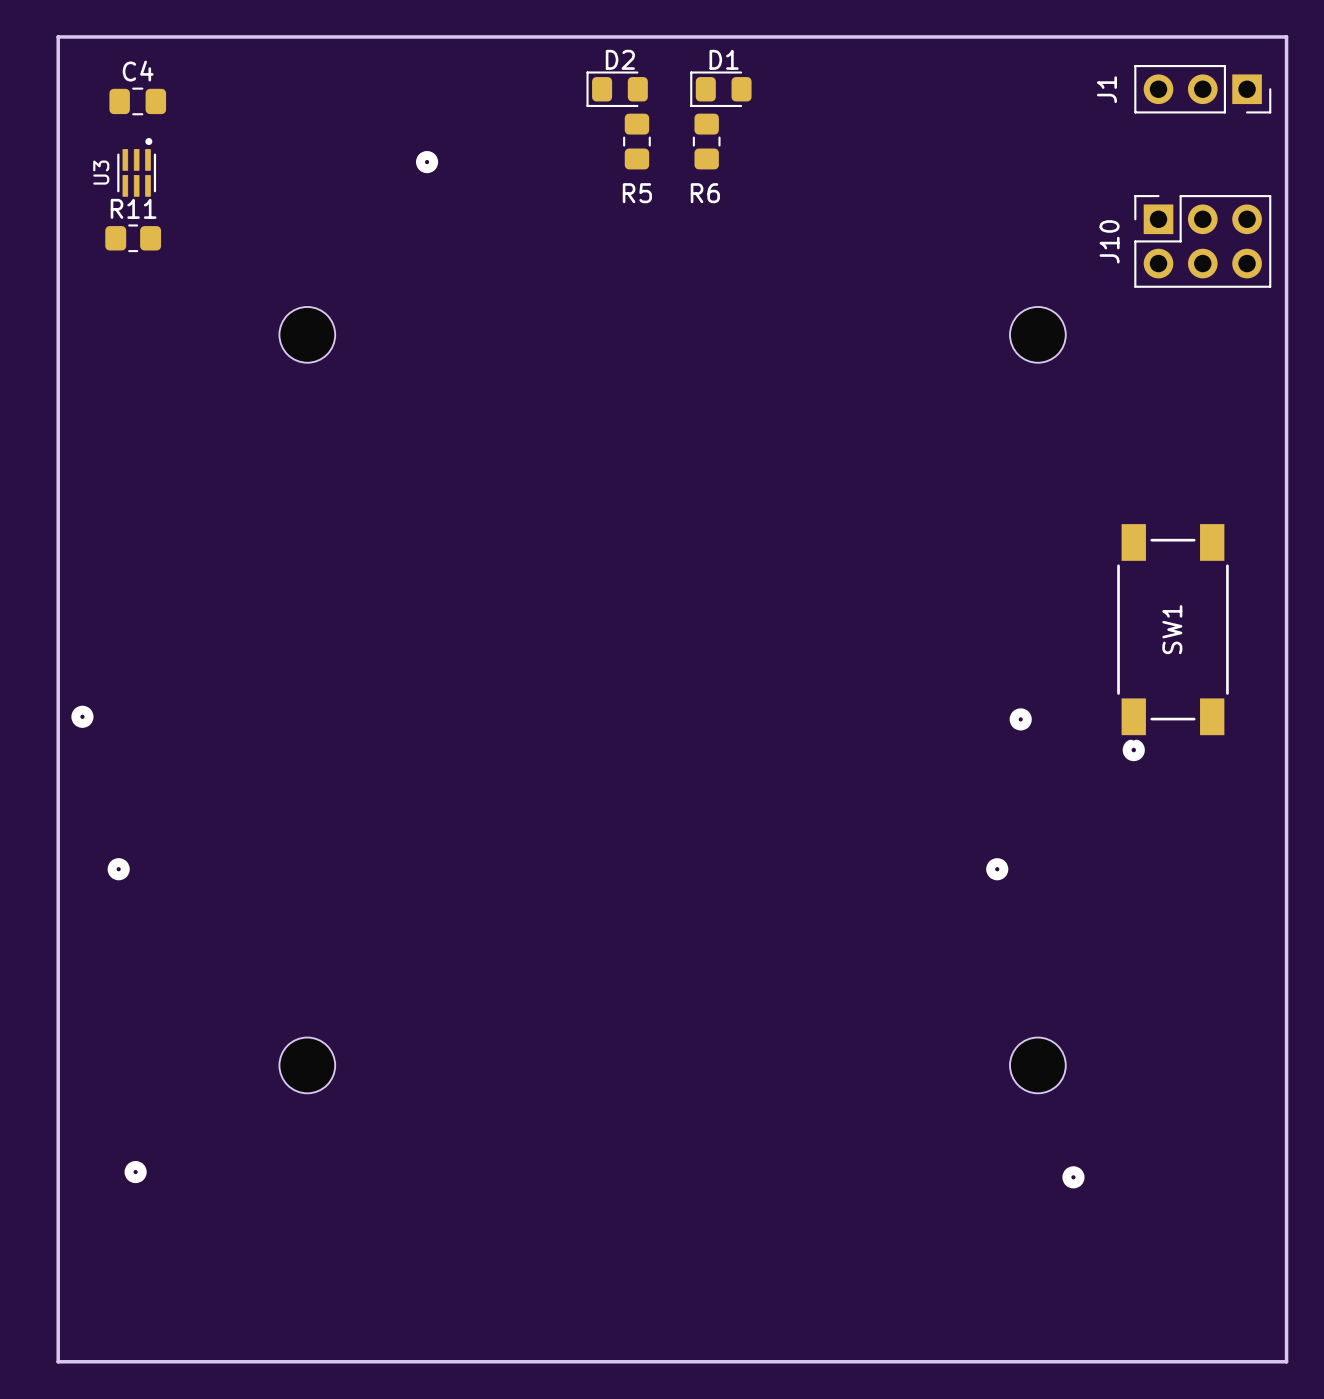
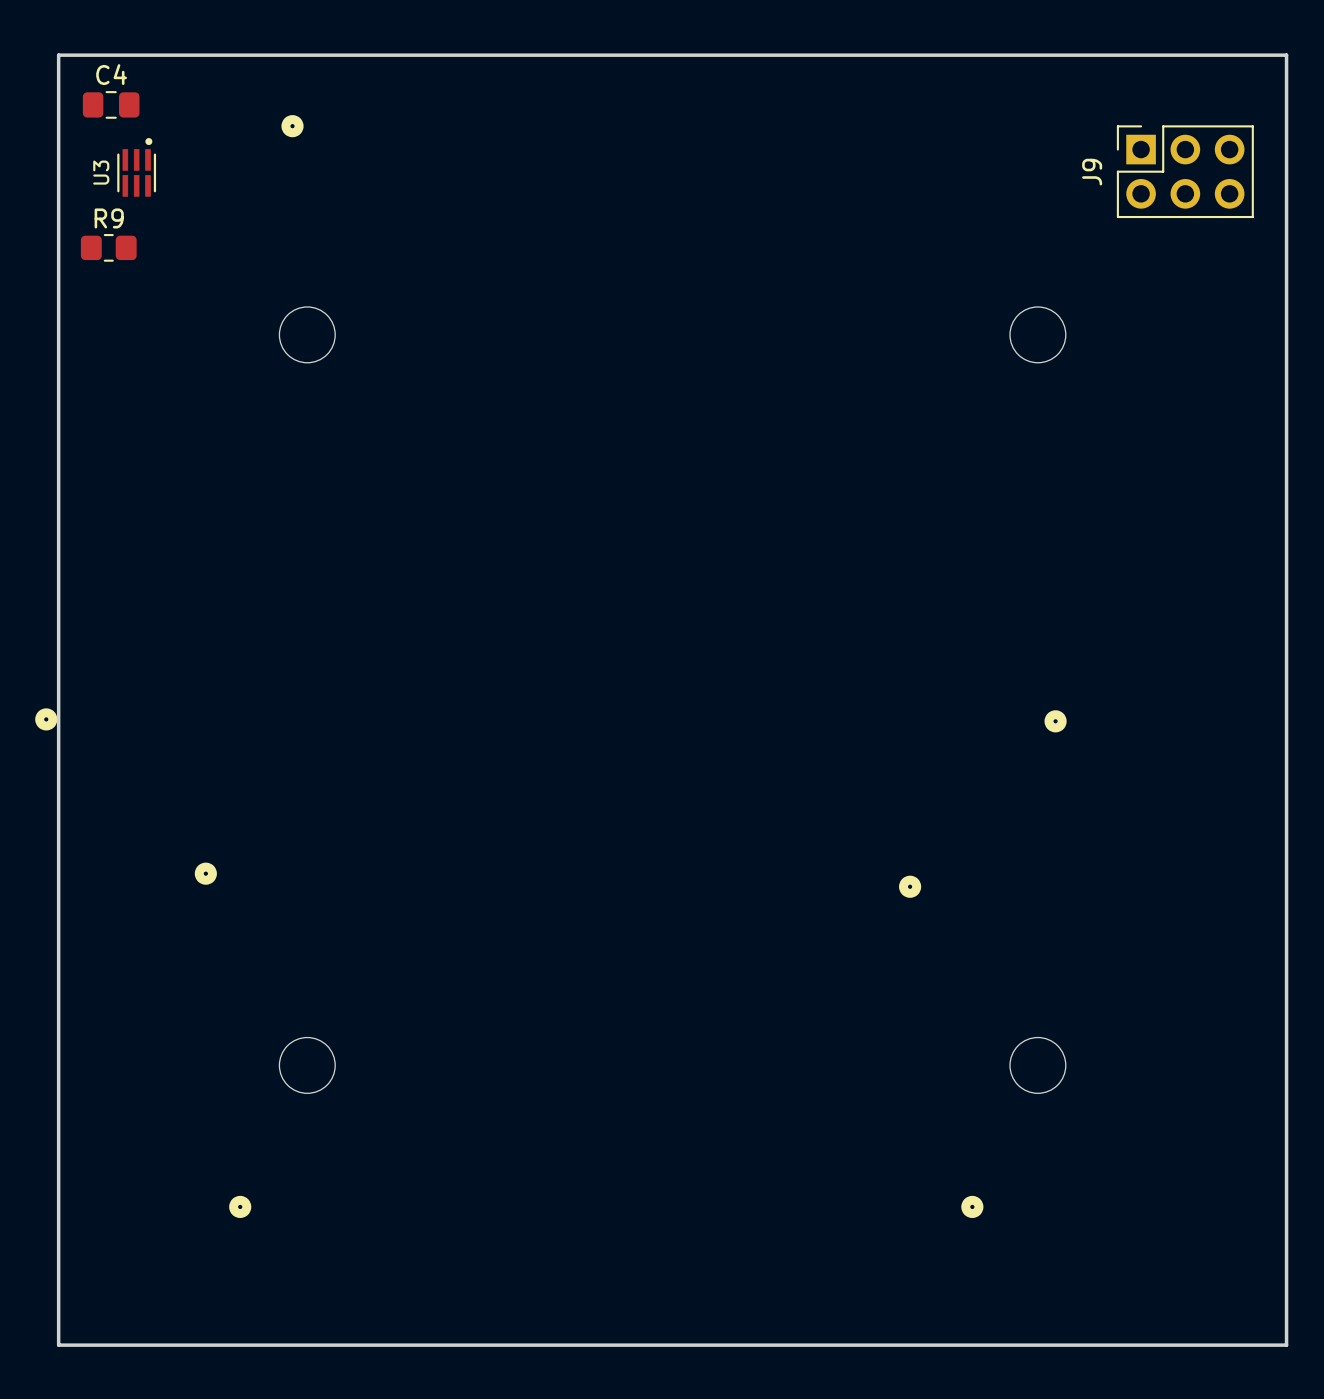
board edge: (1286, 55) (1286, 36) (58, 36) (58, 1361) (1286, 1361) (1286, 1345) -> (1286, 55) (58, 55) (58, 1345) (1286, 1345)
D2: (617, 89) -> none
D1: (720, 89) -> none
J1: (1202, 89) -> none
C4 position: (137, 101) -> (111, 104)
R5: (636, 141) -> none
R6: (706, 141) -> none
part position: (427, 162) -> (292, 126)
J9: none -> (1185, 171)
R11: (133, 238) -> none
J10: (1202, 241) -> none
R9: none -> (108, 247)
SW1: (1172, 642) -> none
part position: (82, 716) -> (46, 719)
part position: (1020, 719) -> (1055, 721)
part: (118, 869) -> none
part: (997, 869) -> none
part: none -> (205, 873)
part: none -> (910, 886)
part position: (135, 1172) -> (240, 1206)
part position: (1073, 1177) -> (972, 1206)

